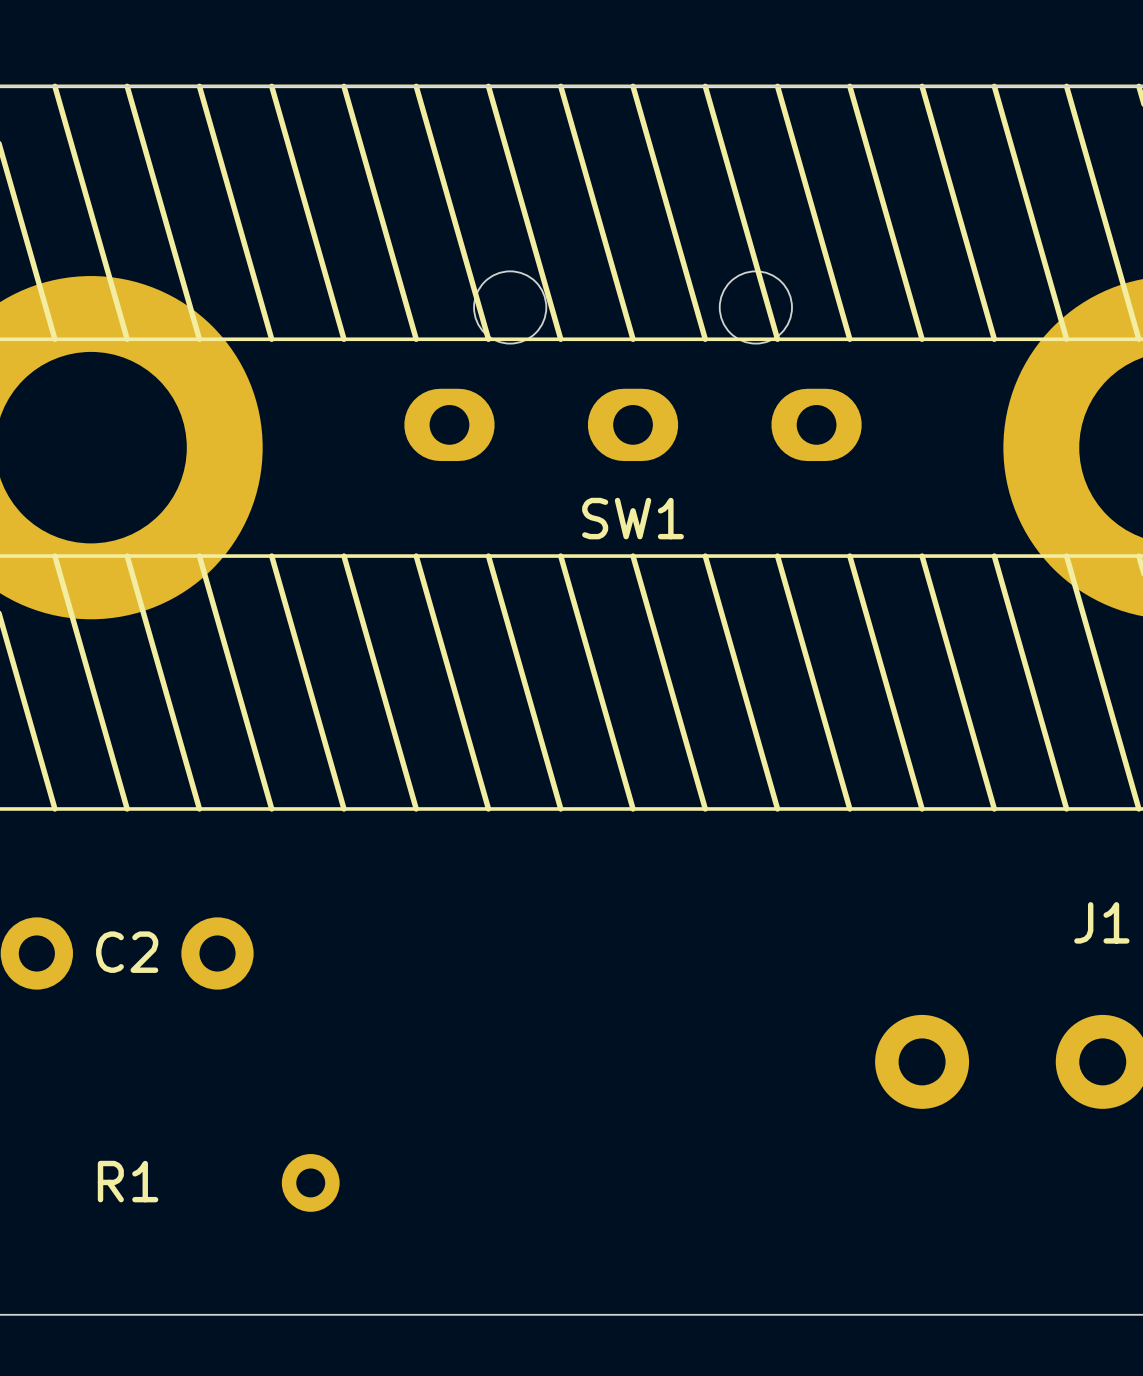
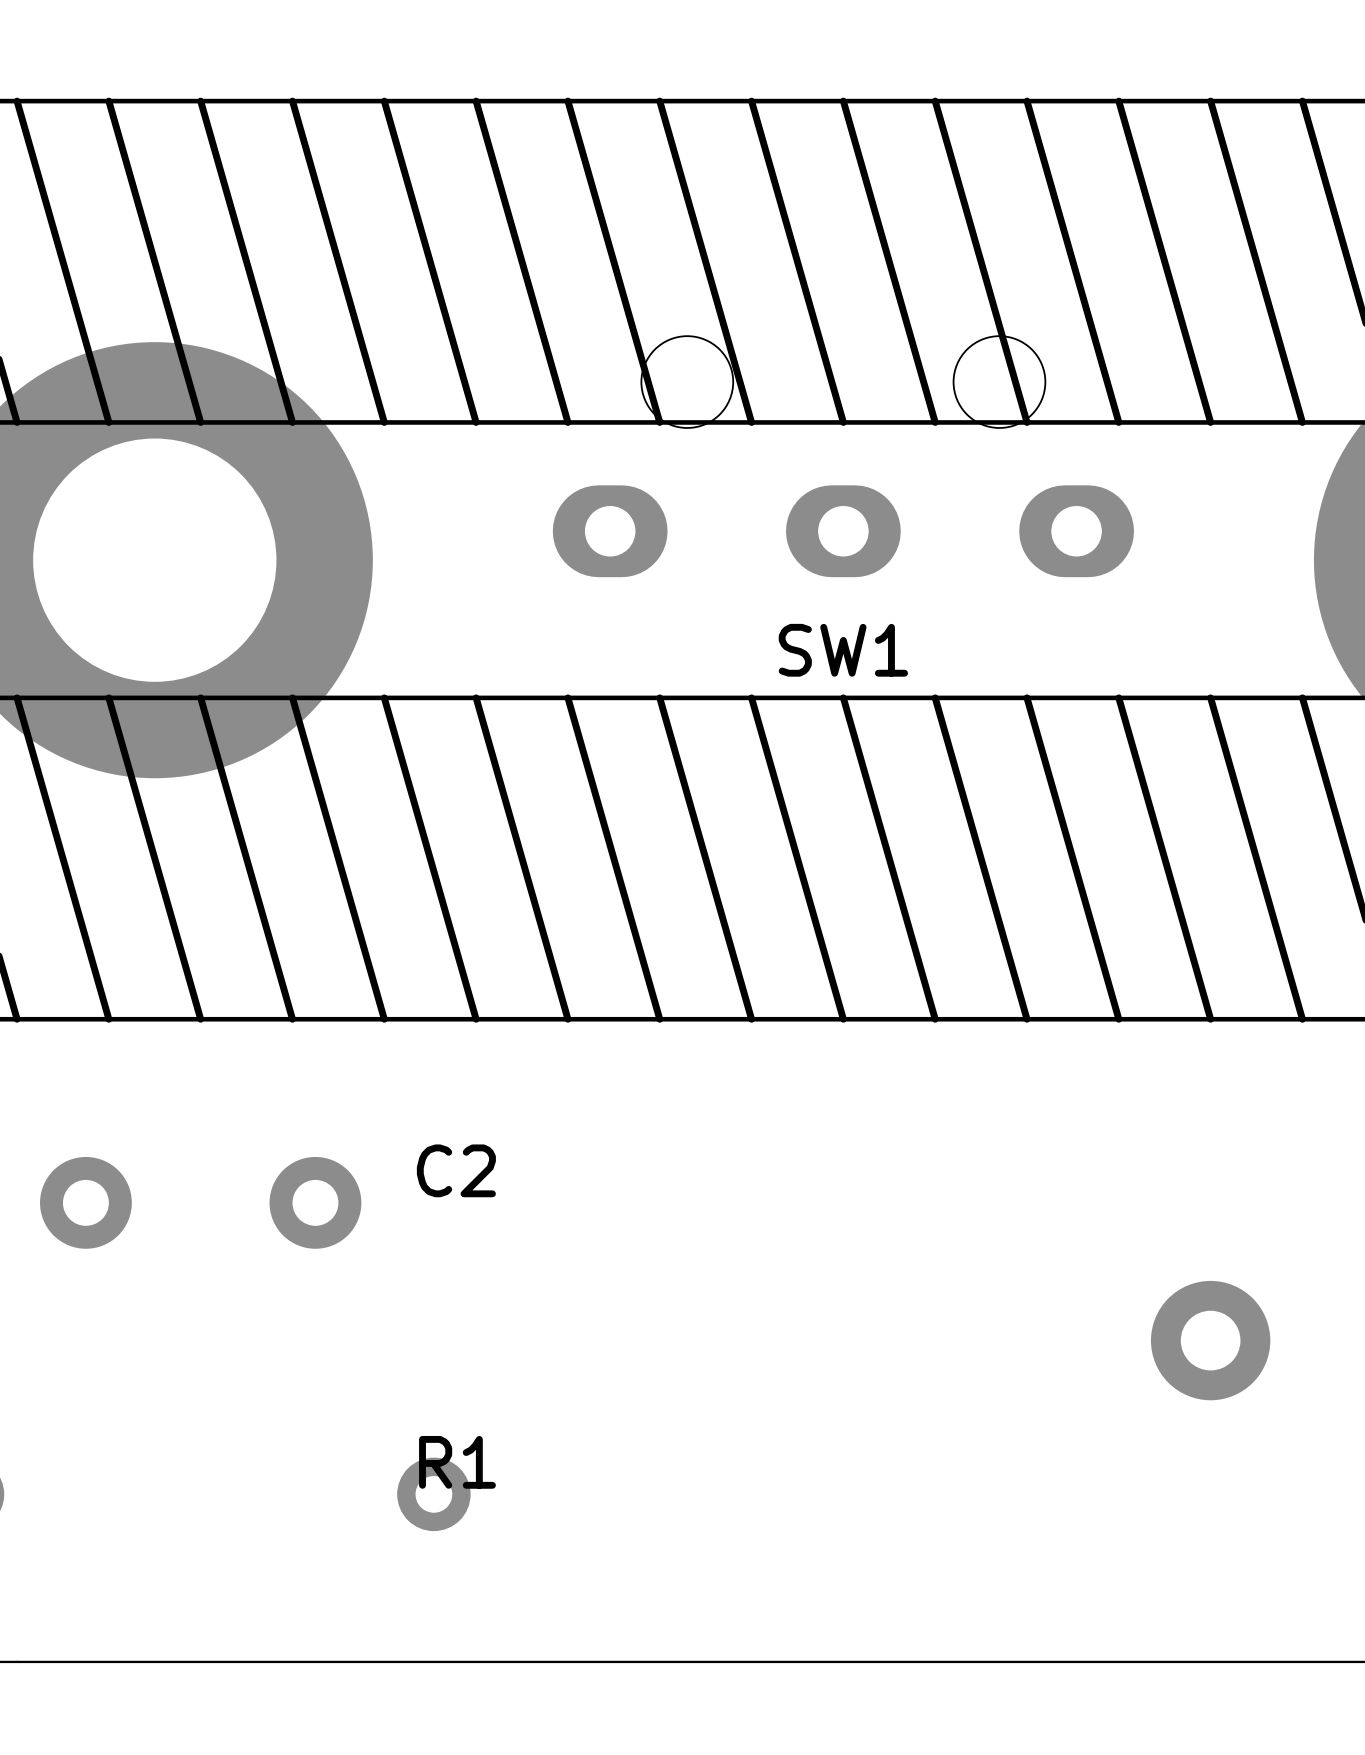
text position: C2 (127, 952) -> C2 (456, 1170)
text position: R1 (128, 1181) -> R1 (457, 1462)

